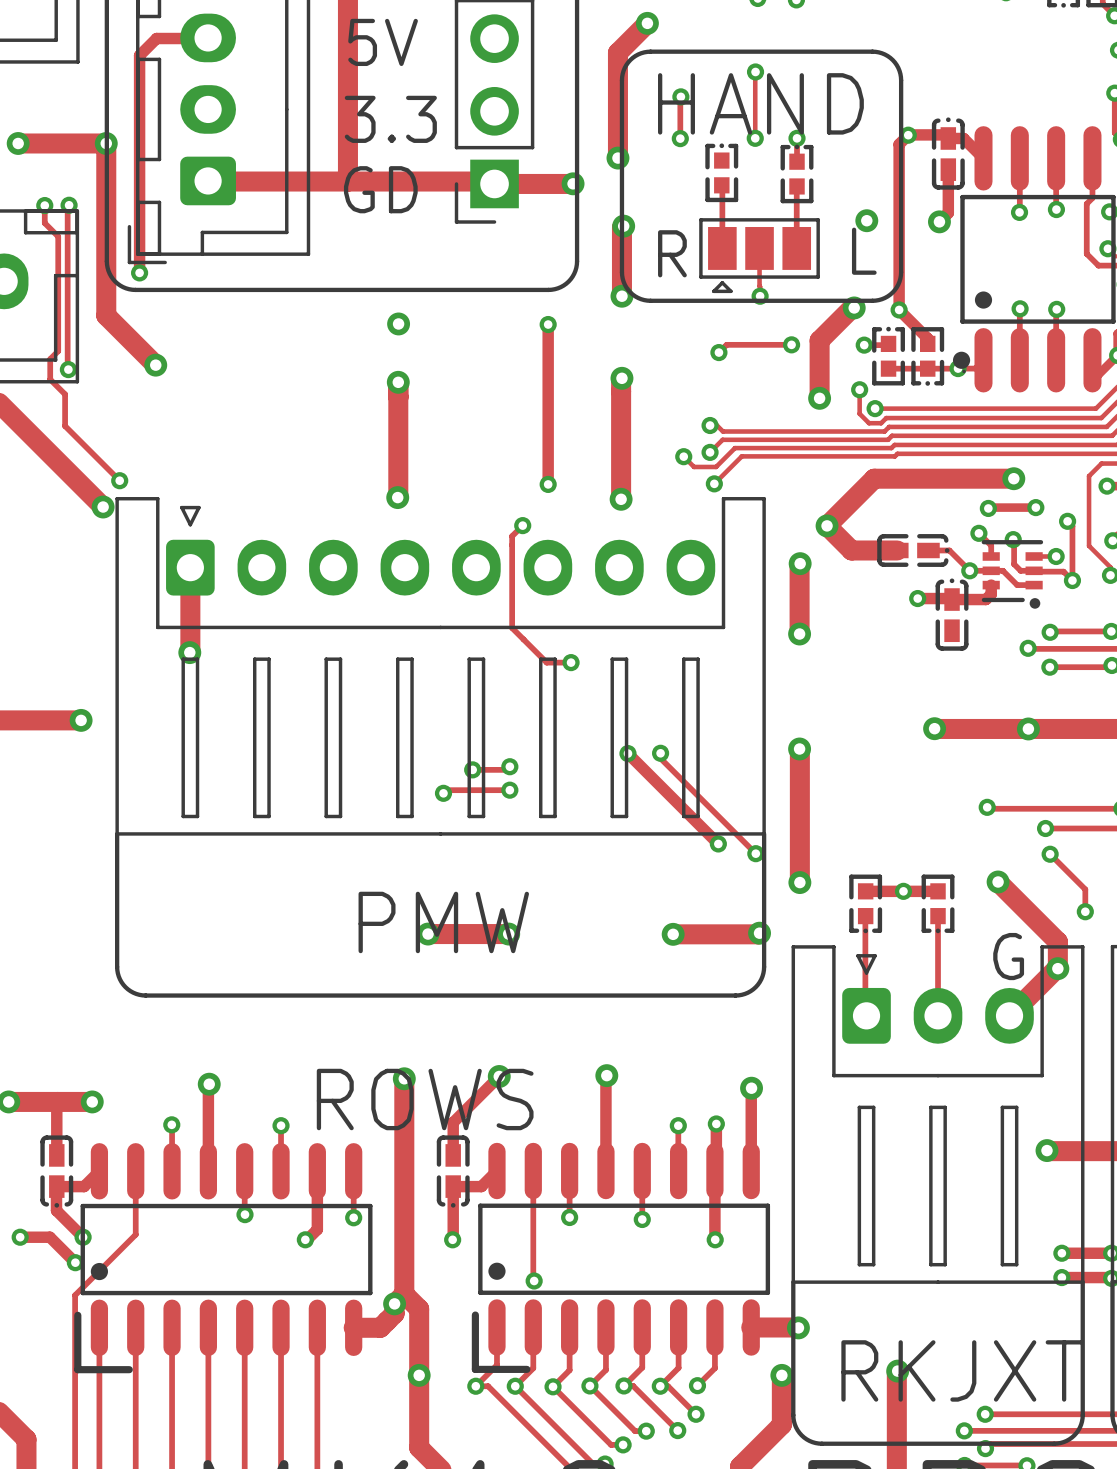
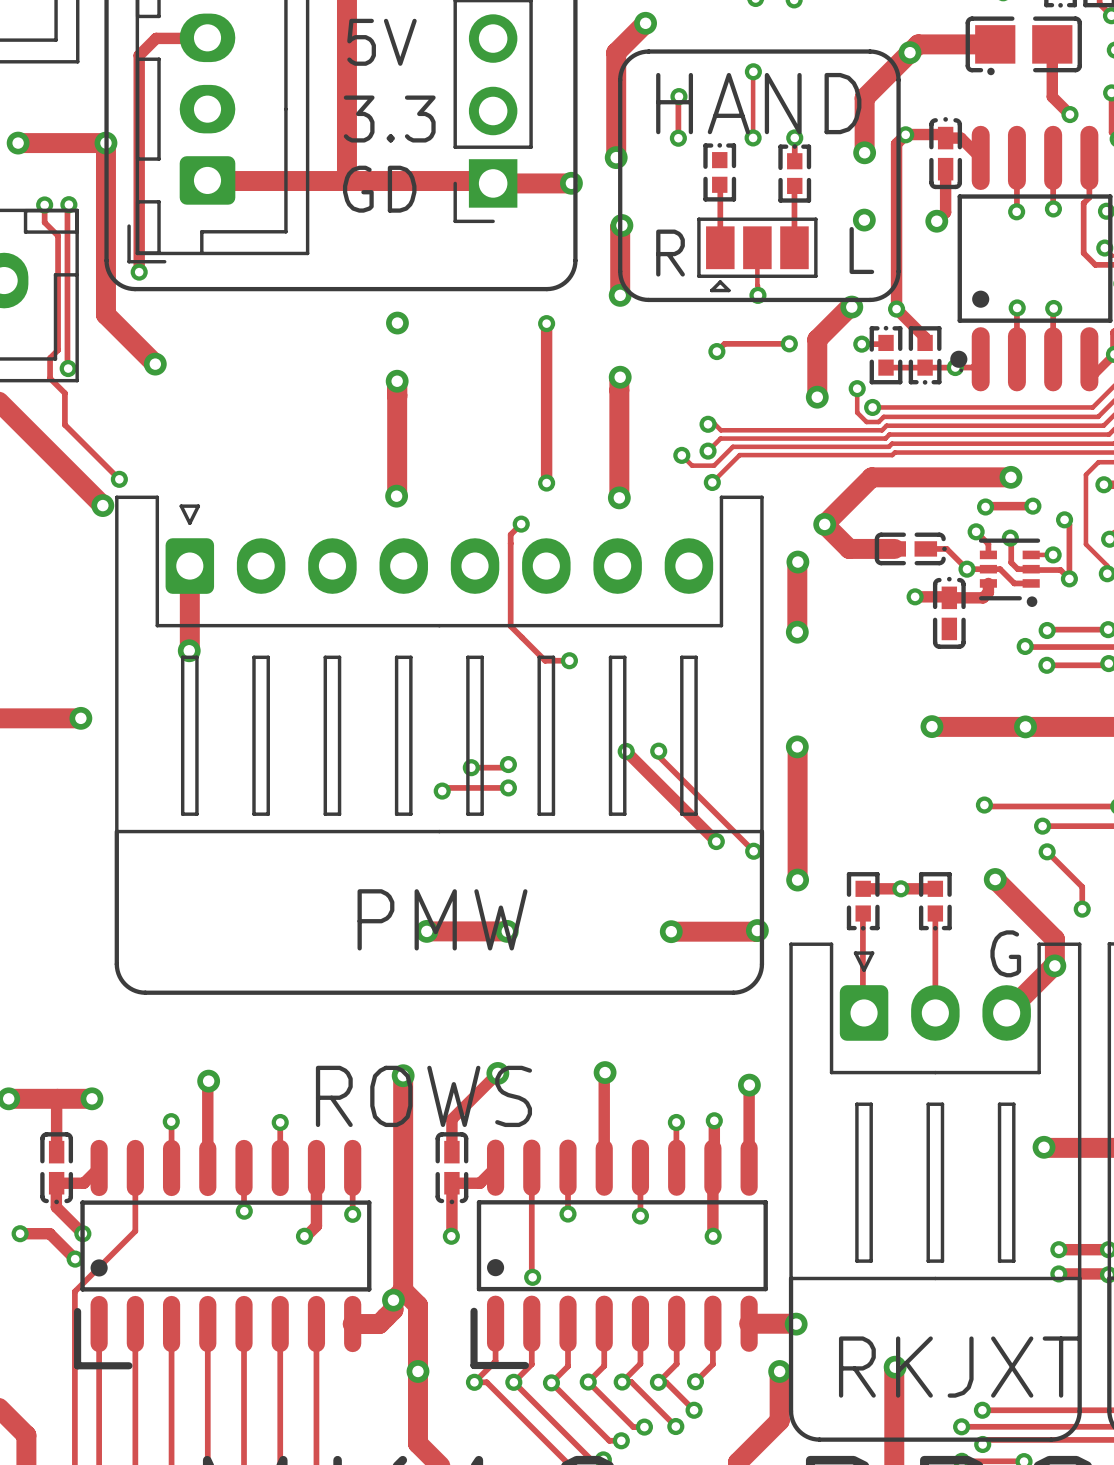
track: none -> (995, 44) (918, 44) (864, 98) (864, 152)
track: none -> (1052, 44) (1052, 96) (1069, 114)
part: none -> (1023, 45)
via: none -> (909, 52)
via: none -> (1069, 114)
via: none -> (864, 152)

